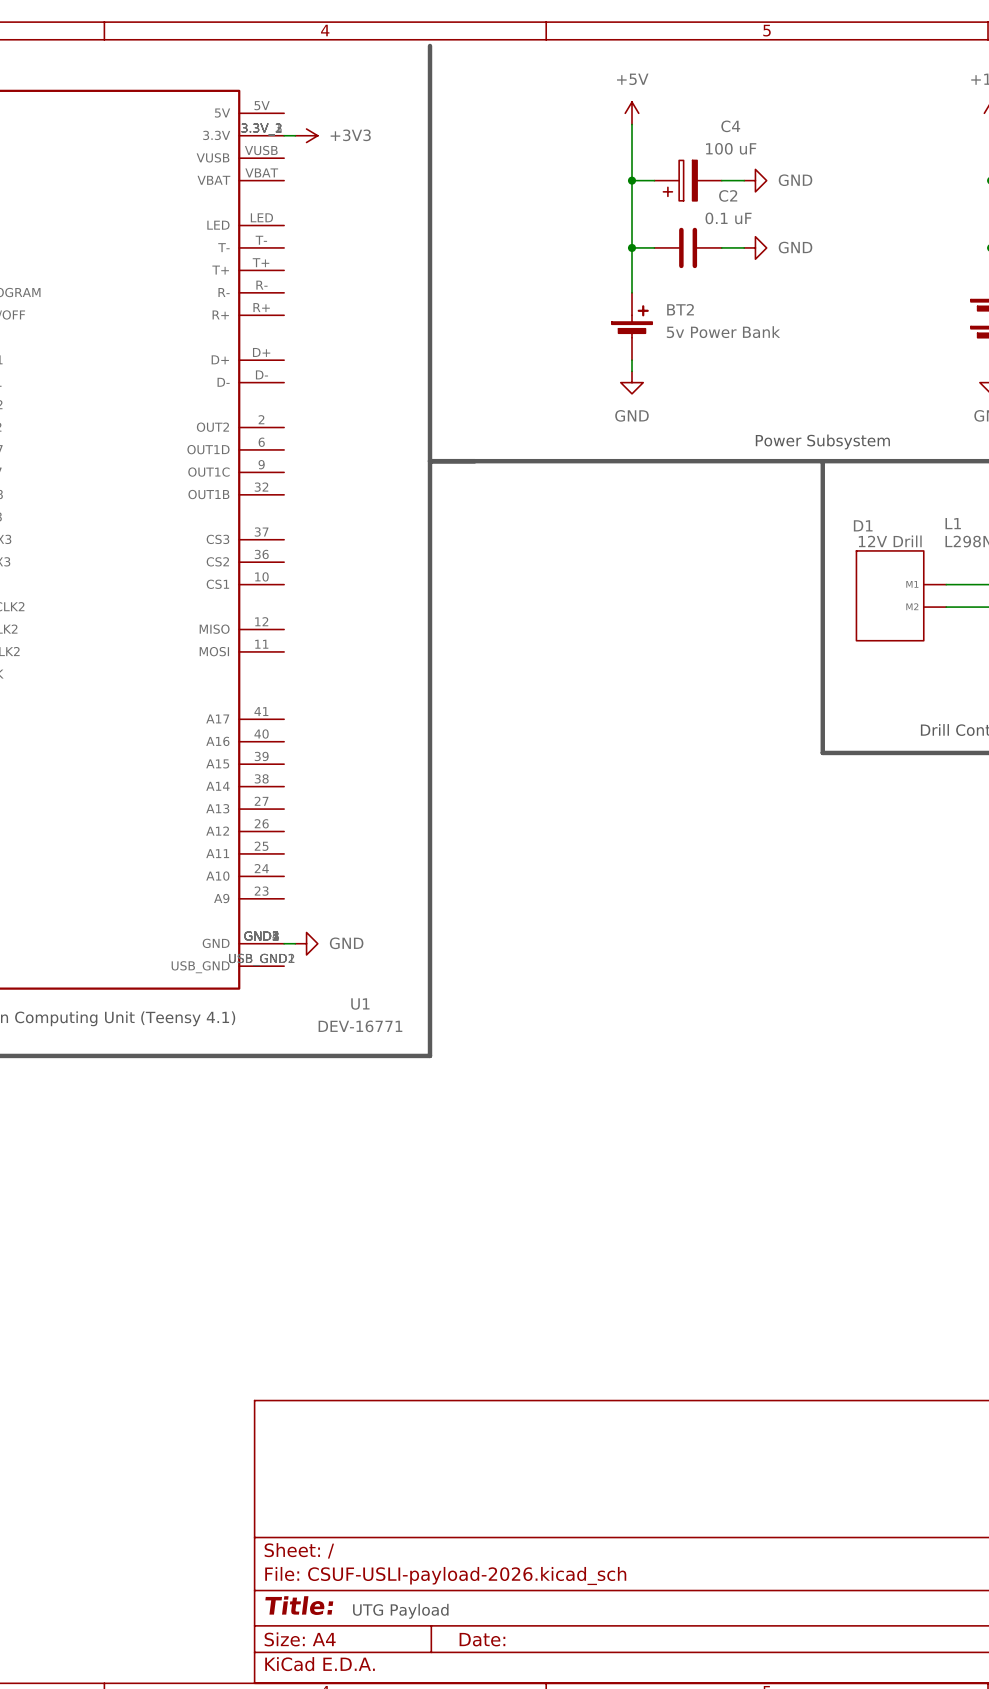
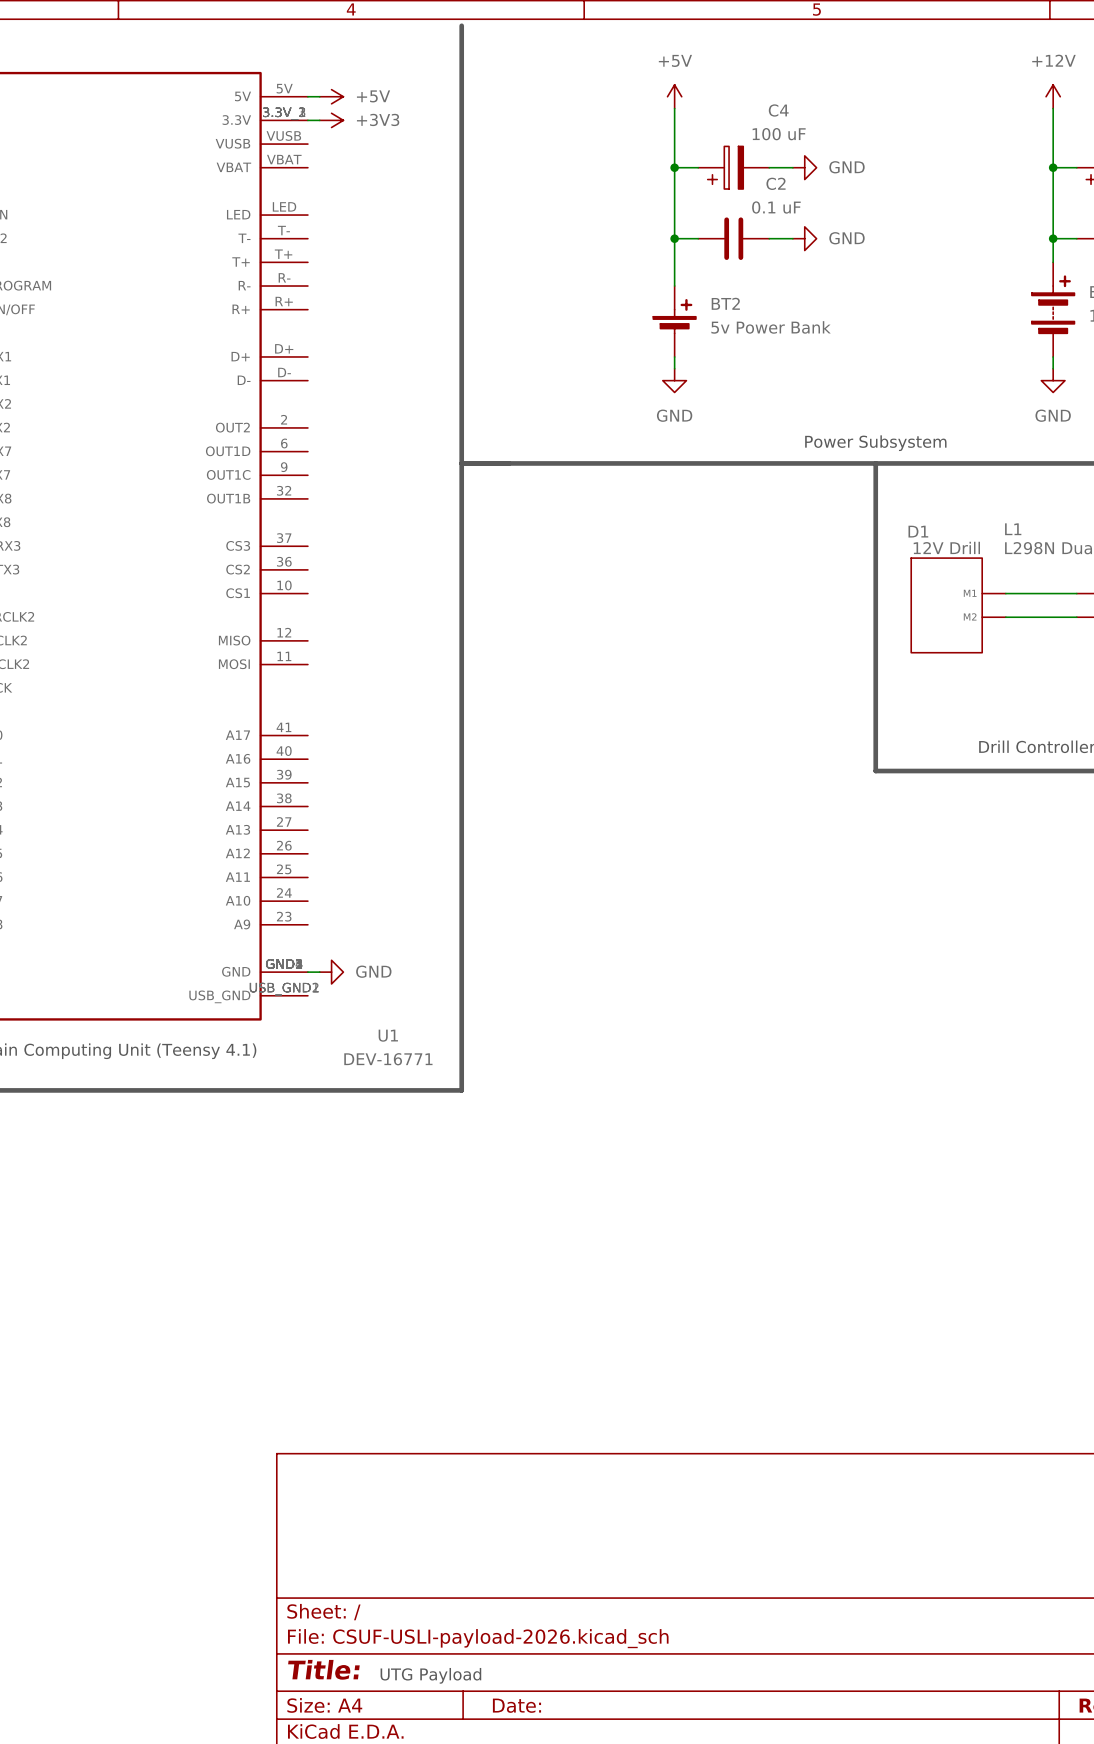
wire: none -> (307, 96) (319, 96)
power symbol: none -> +5V (331, 96)

